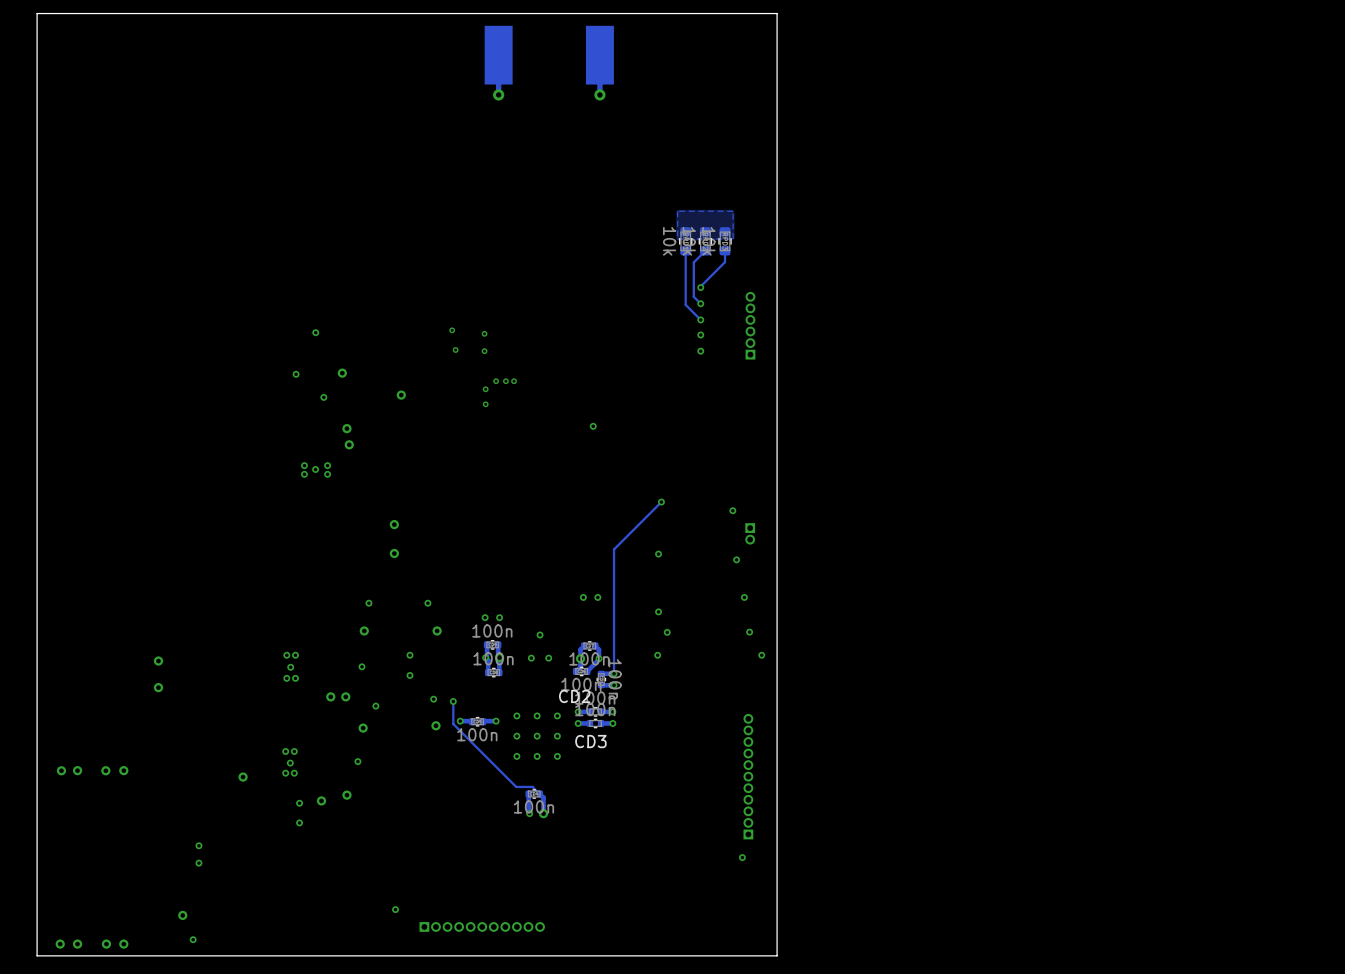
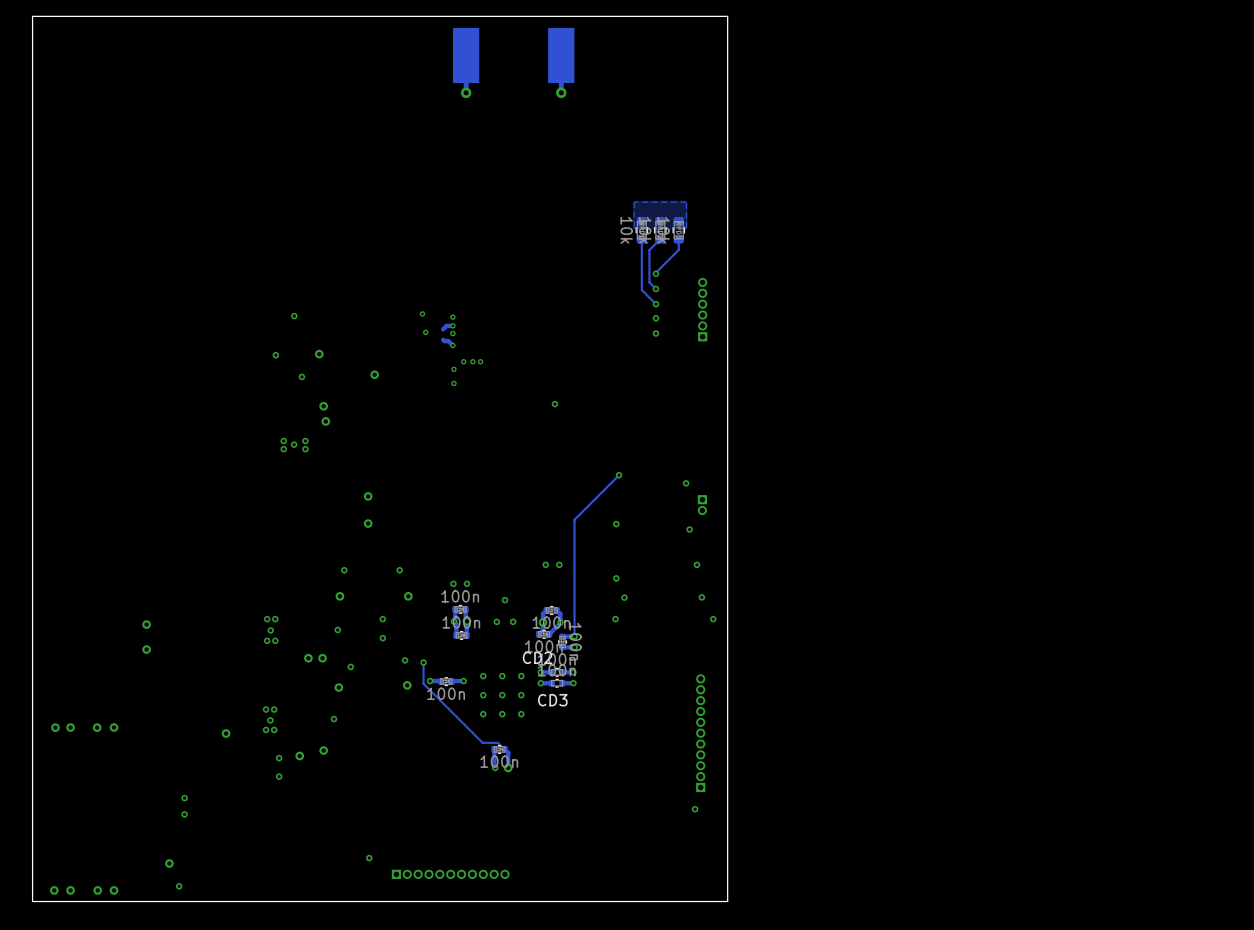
track: none -> (452, 325) (446, 325) (443, 329)
via: none -> (452, 325)
track: none -> (443, 339) (448, 341) (452, 345)
via: none -> (452, 345)

